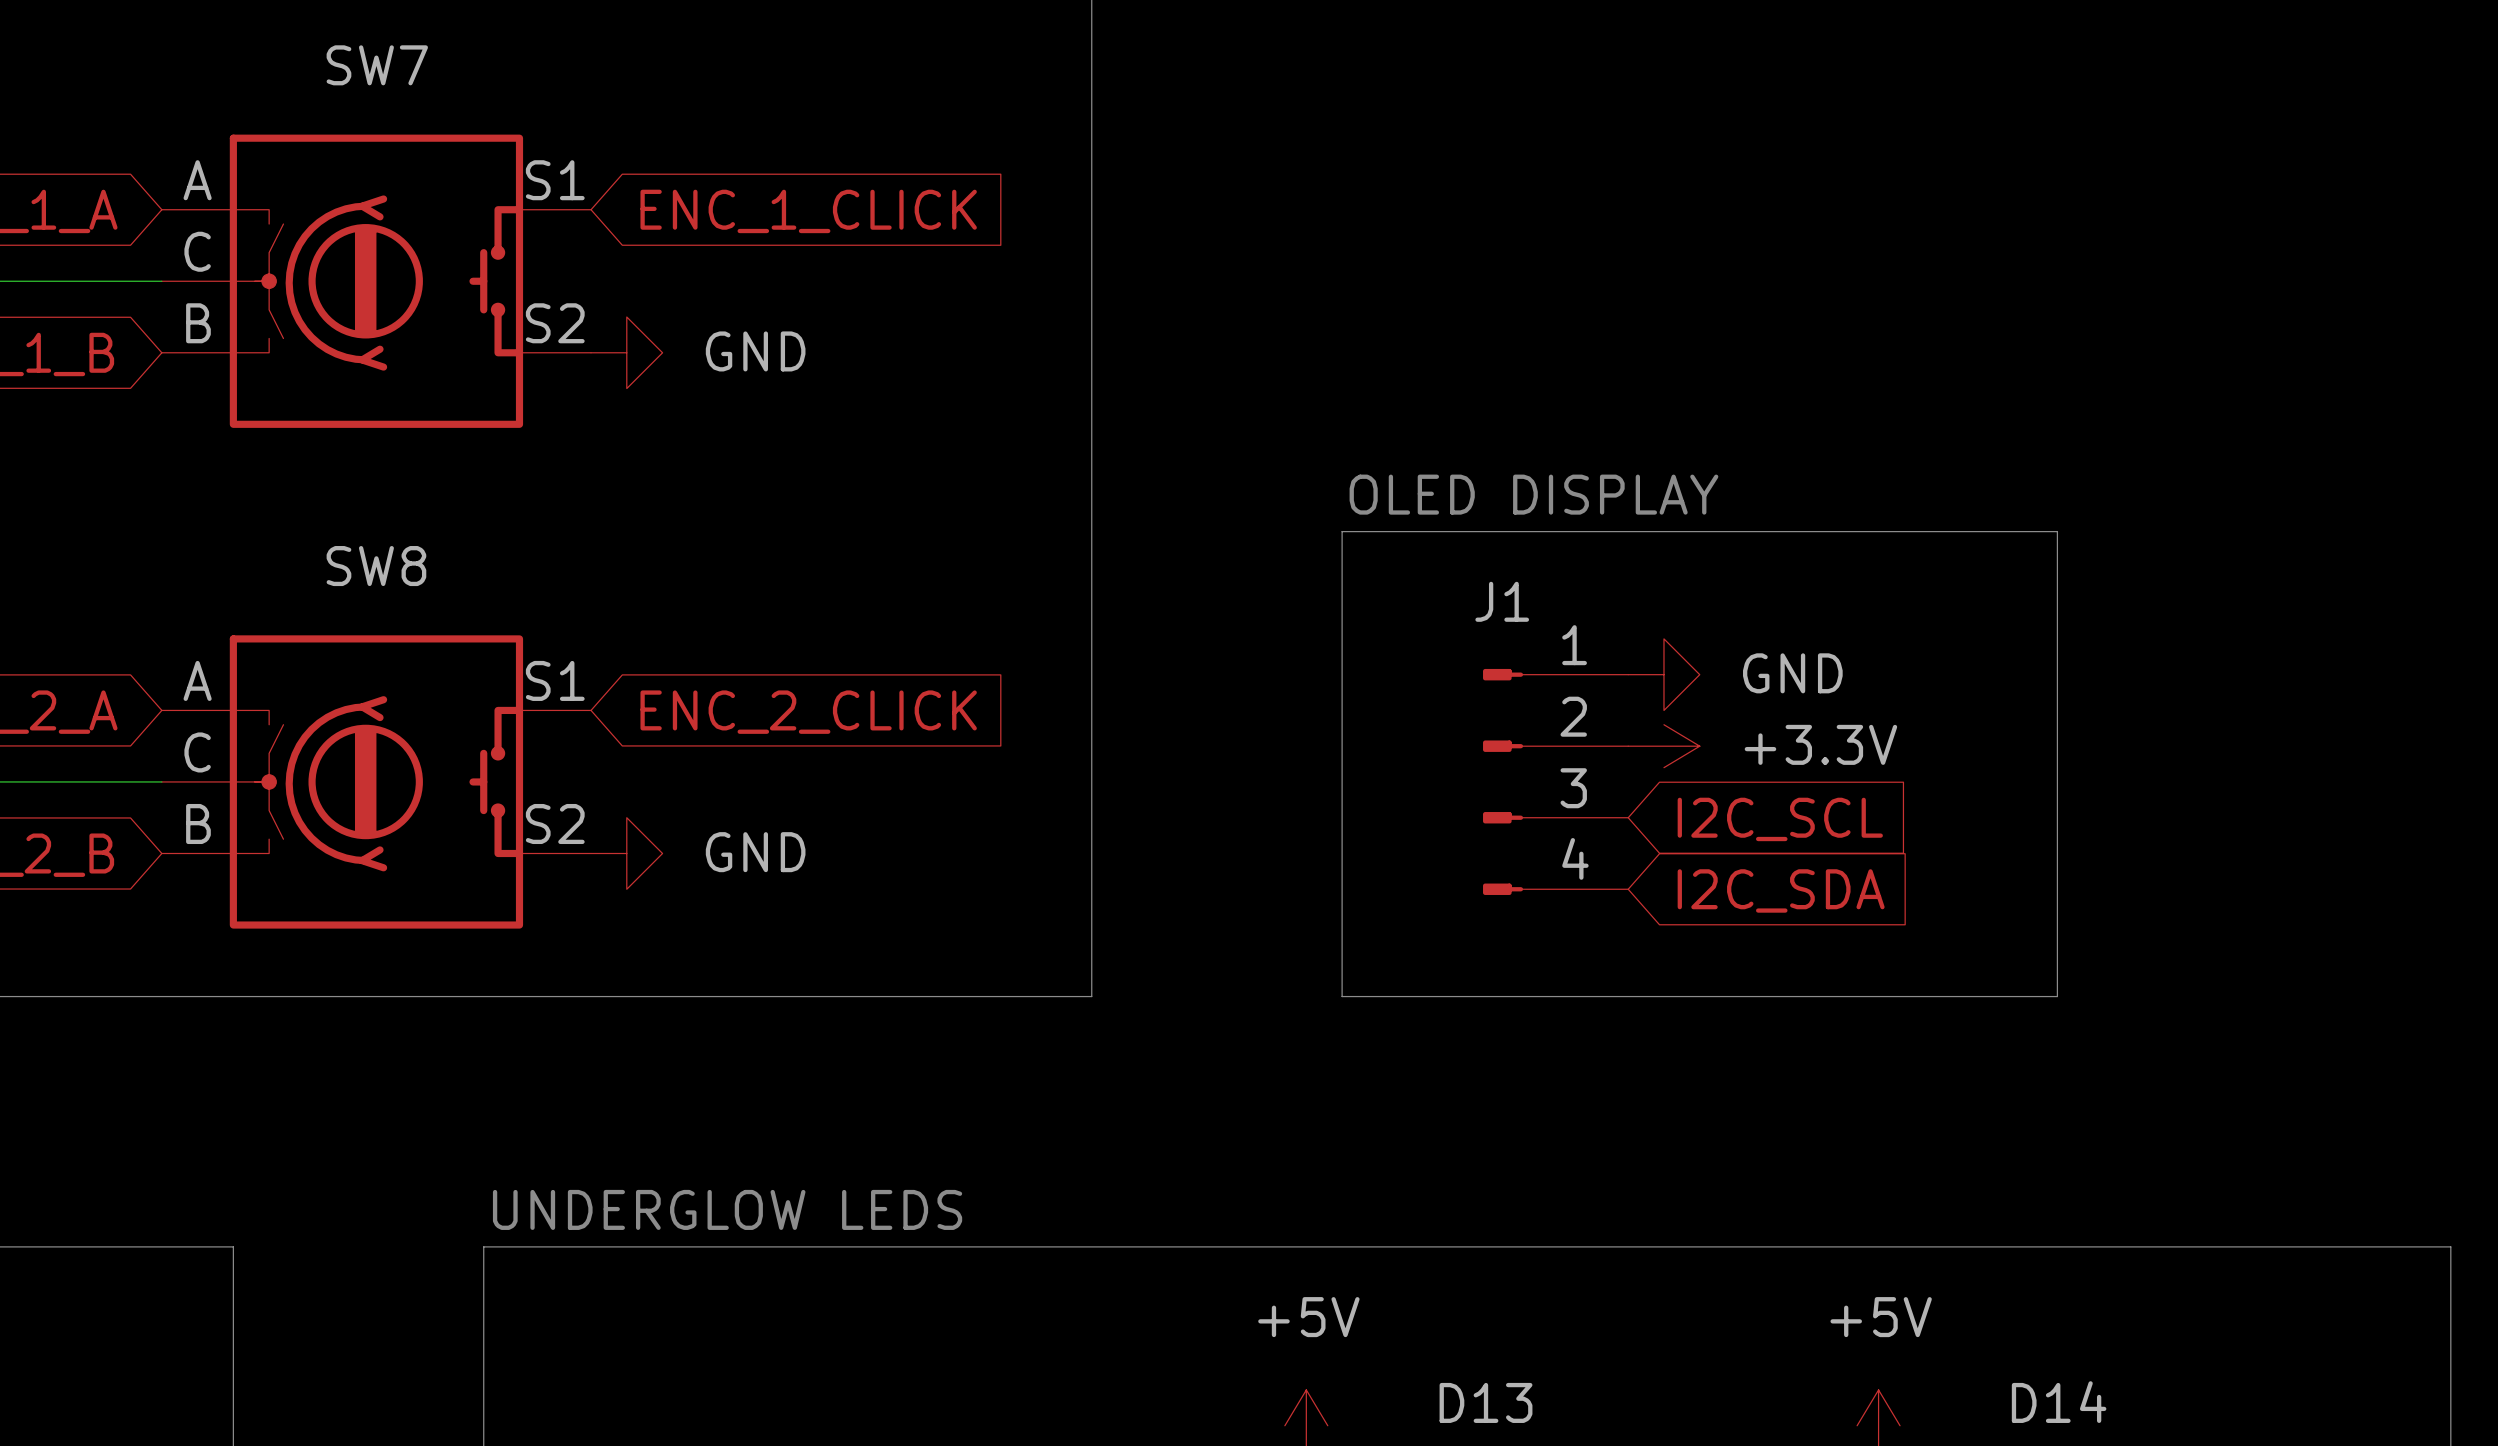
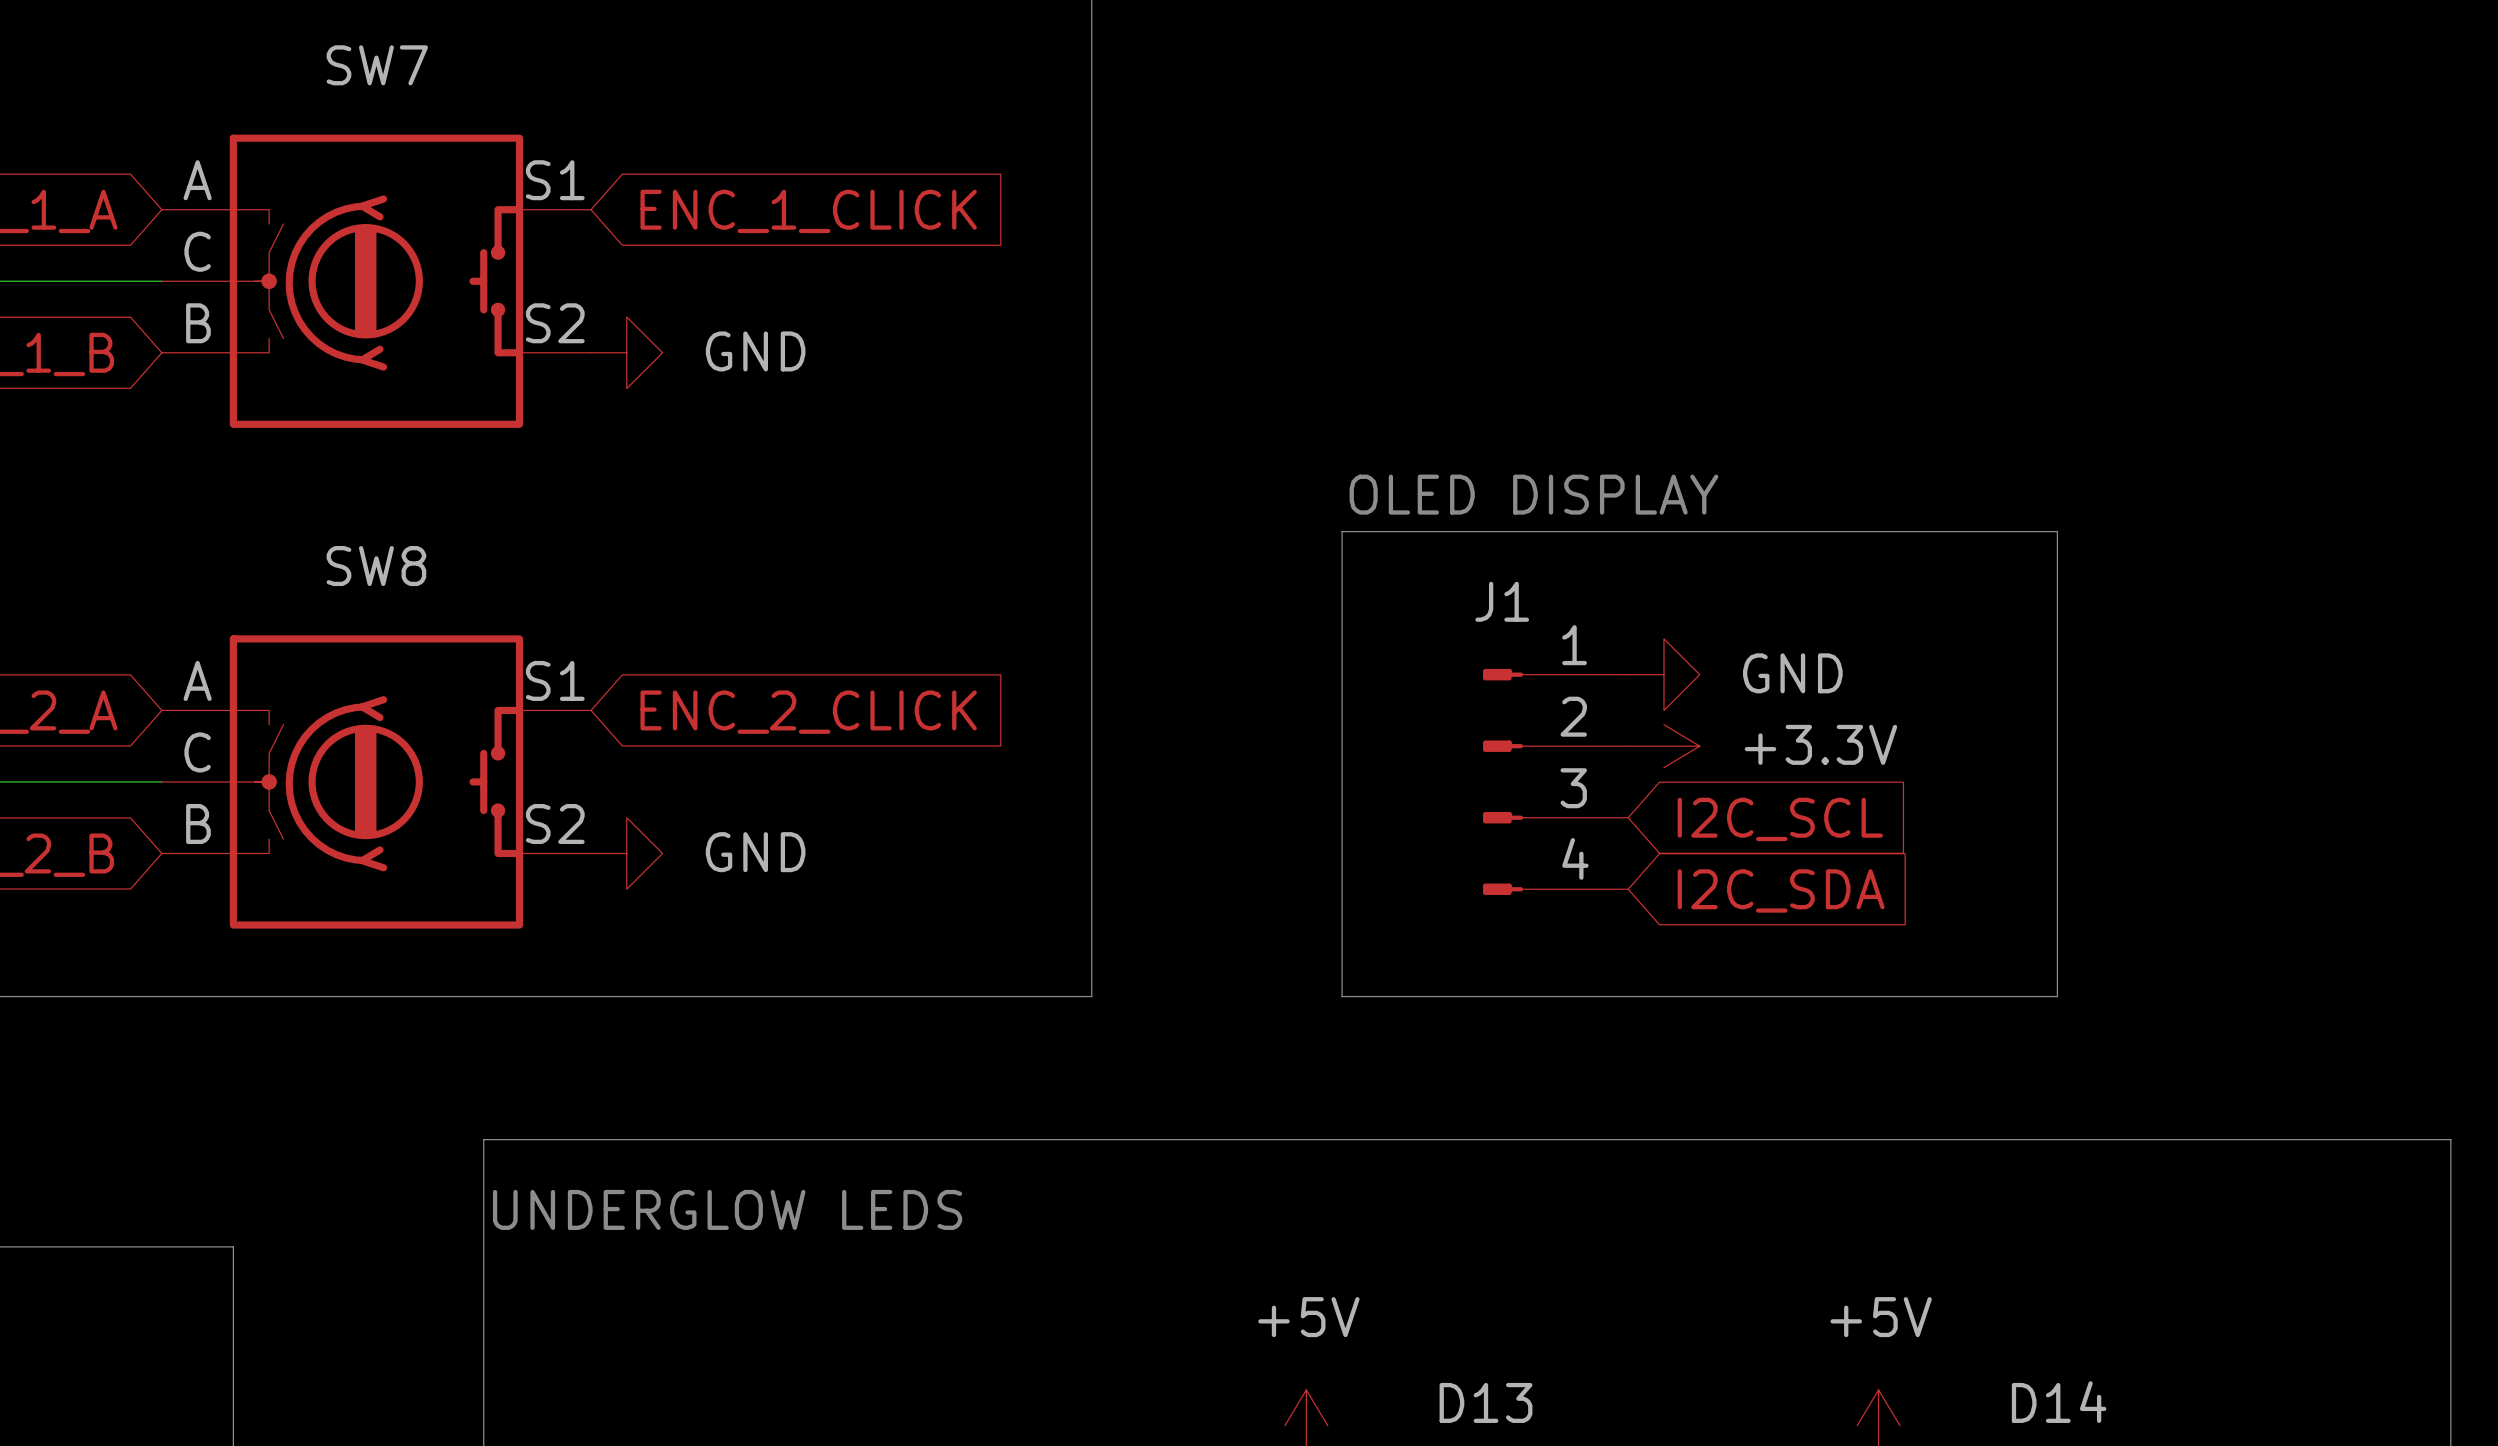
line: (483, 1246) (2450, 1246) -> (483, 1246) (483, 1139) (2450, 1139) (2450, 1246)

